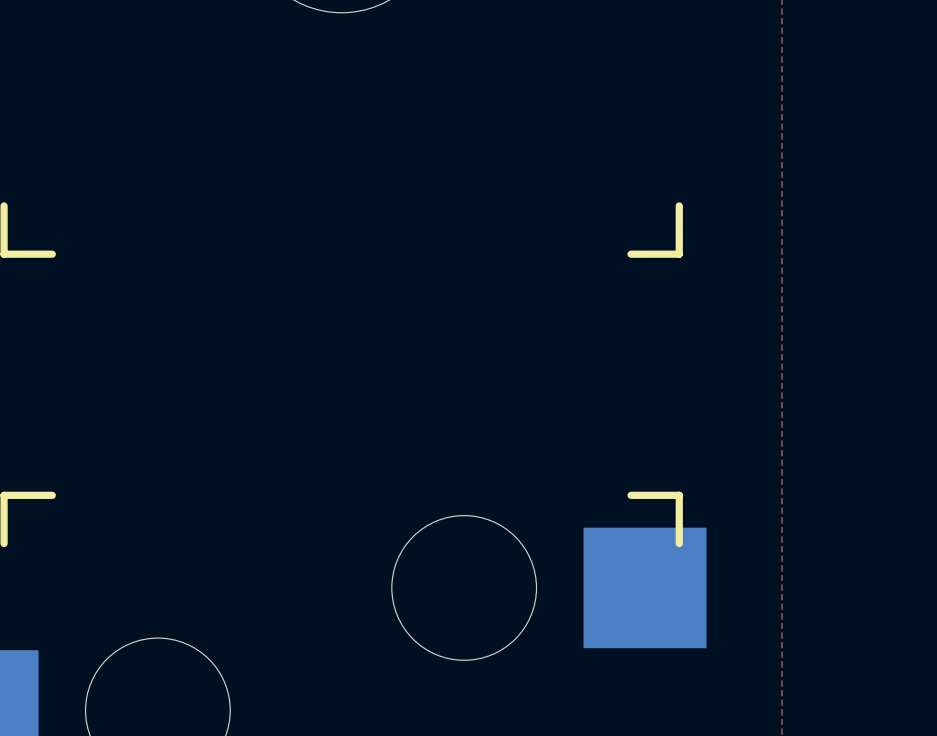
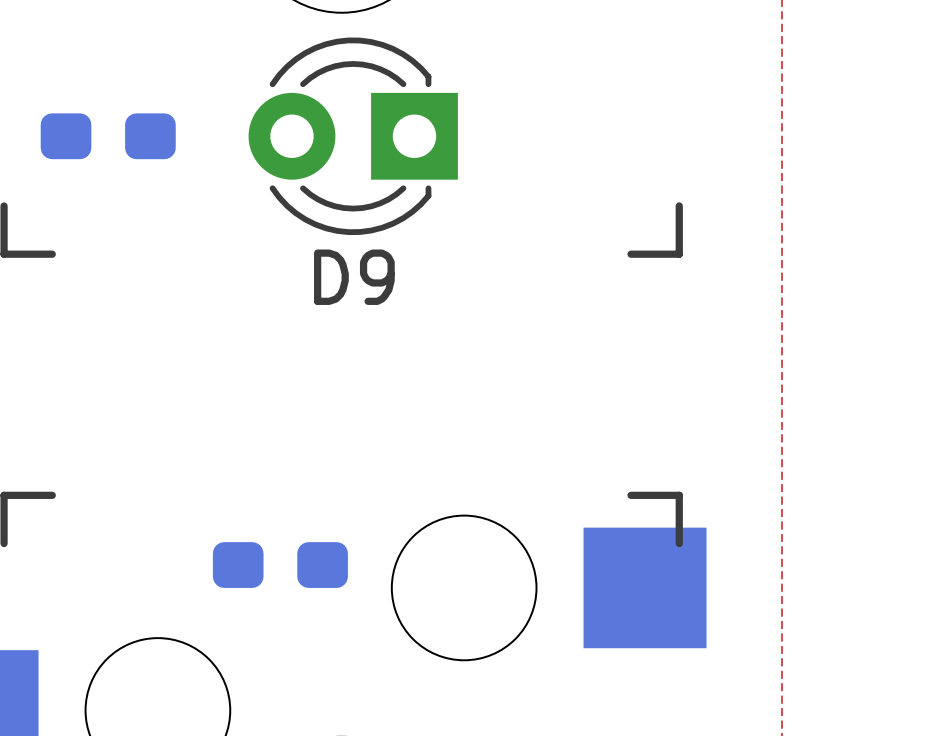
part: none -> (108, 136)
D9: none -> (353, 136)
part: none -> (280, 565)

